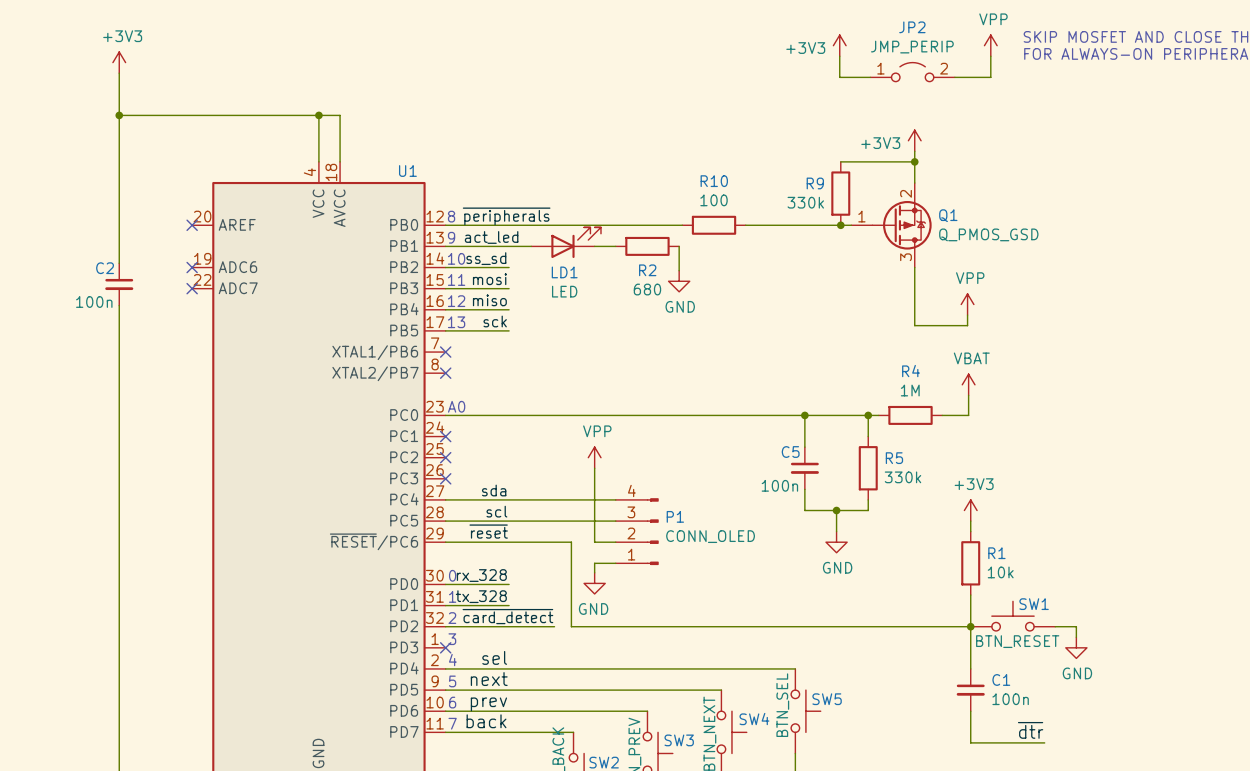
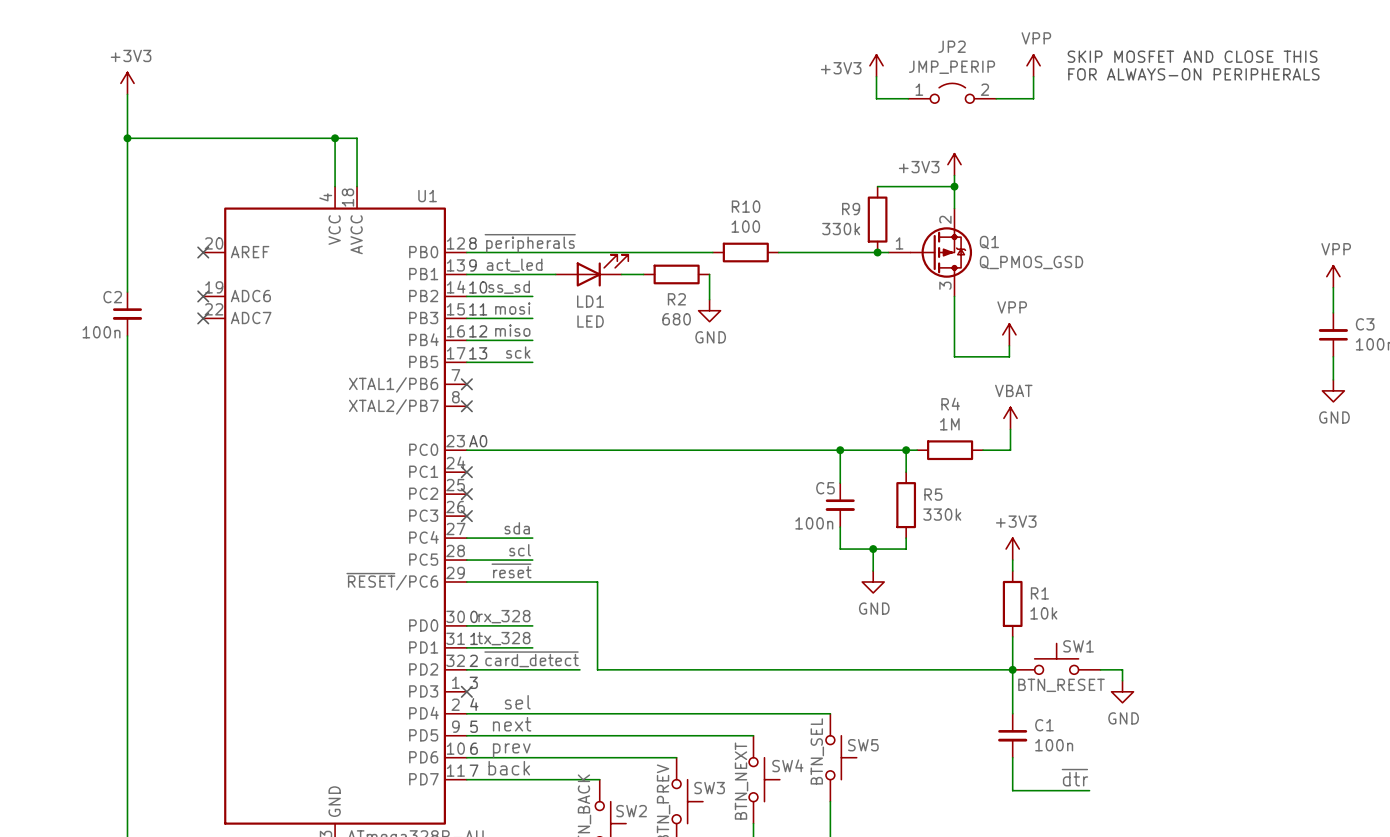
power symbol: VPP (594, 457) -> none
wire: (594, 468) (594, 542) (615, 542) -> none
wire: (509, 499) (615, 499) -> none
wire: (509, 521) (615, 521) -> none
P1: CONN_OLED (637, 531) -> none
wire: (615, 563) (594, 563) (594, 572) -> none
power symbol: GND (594, 583) -> none

